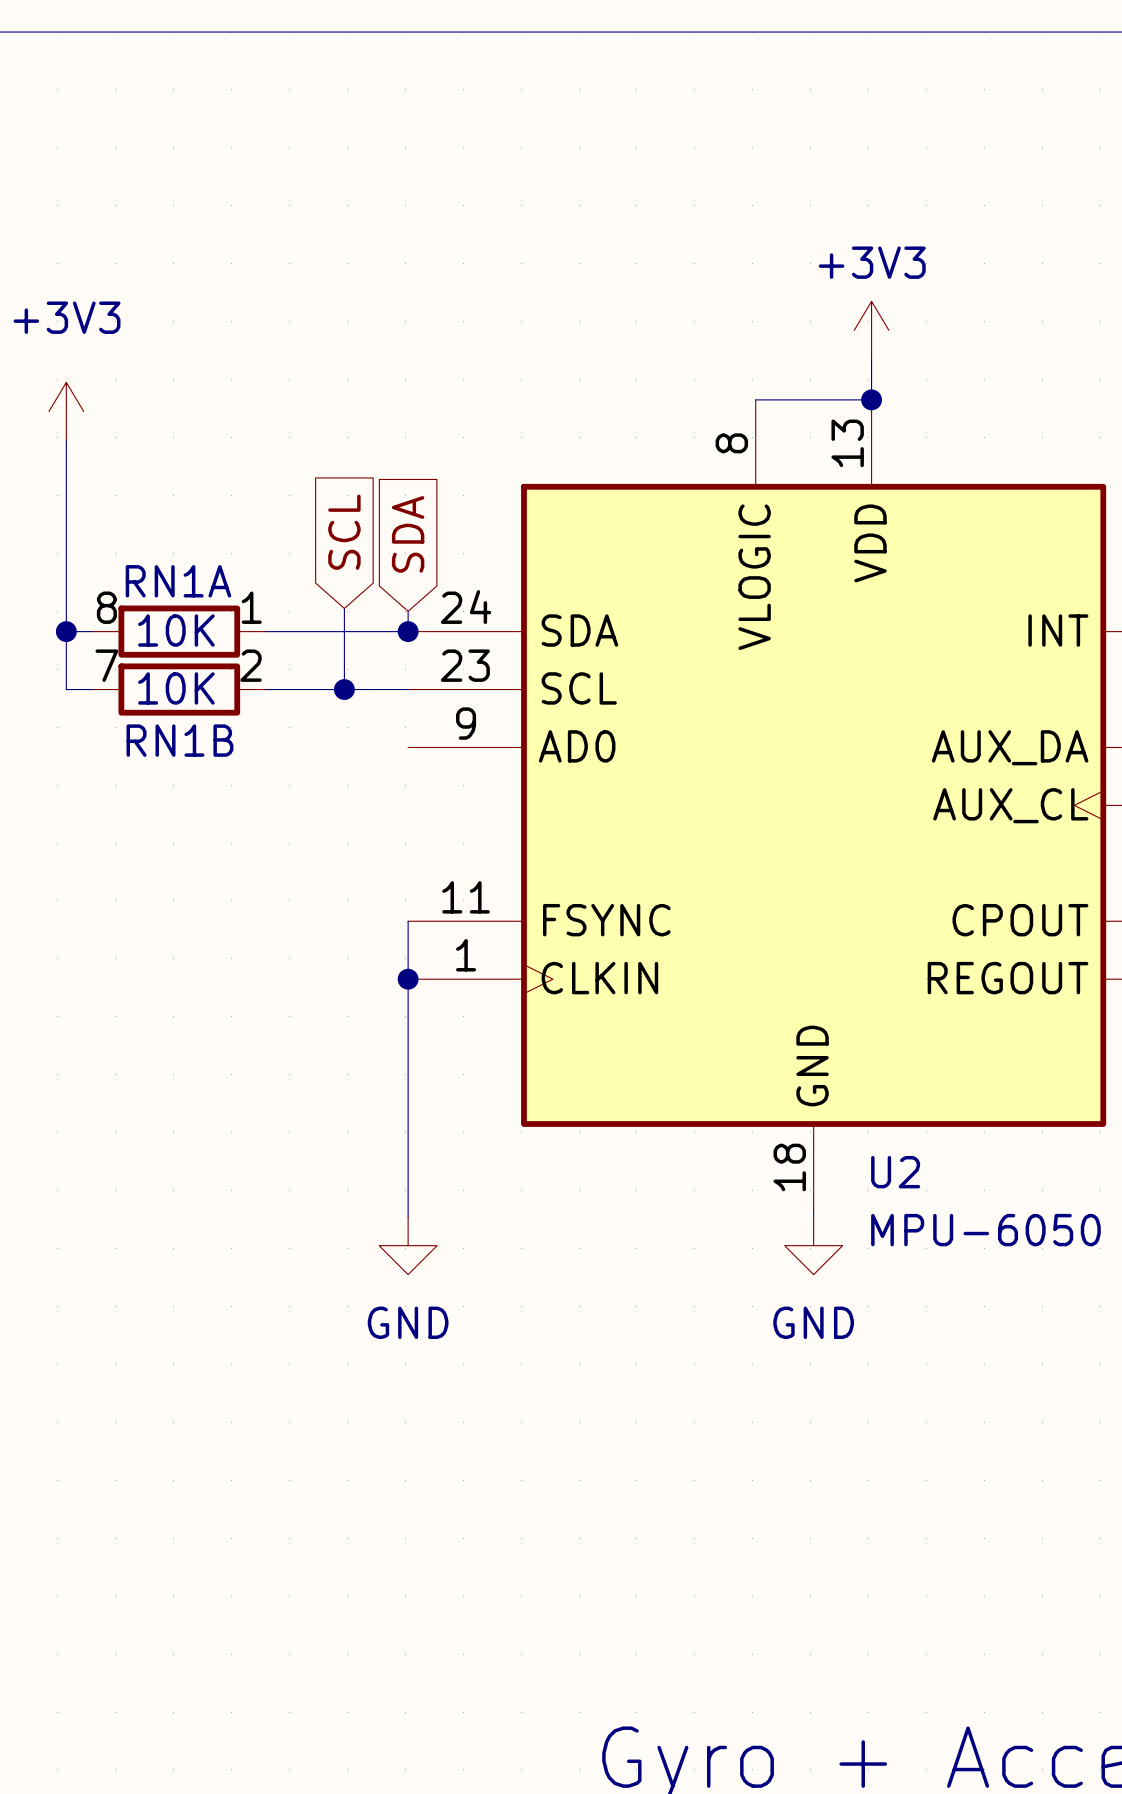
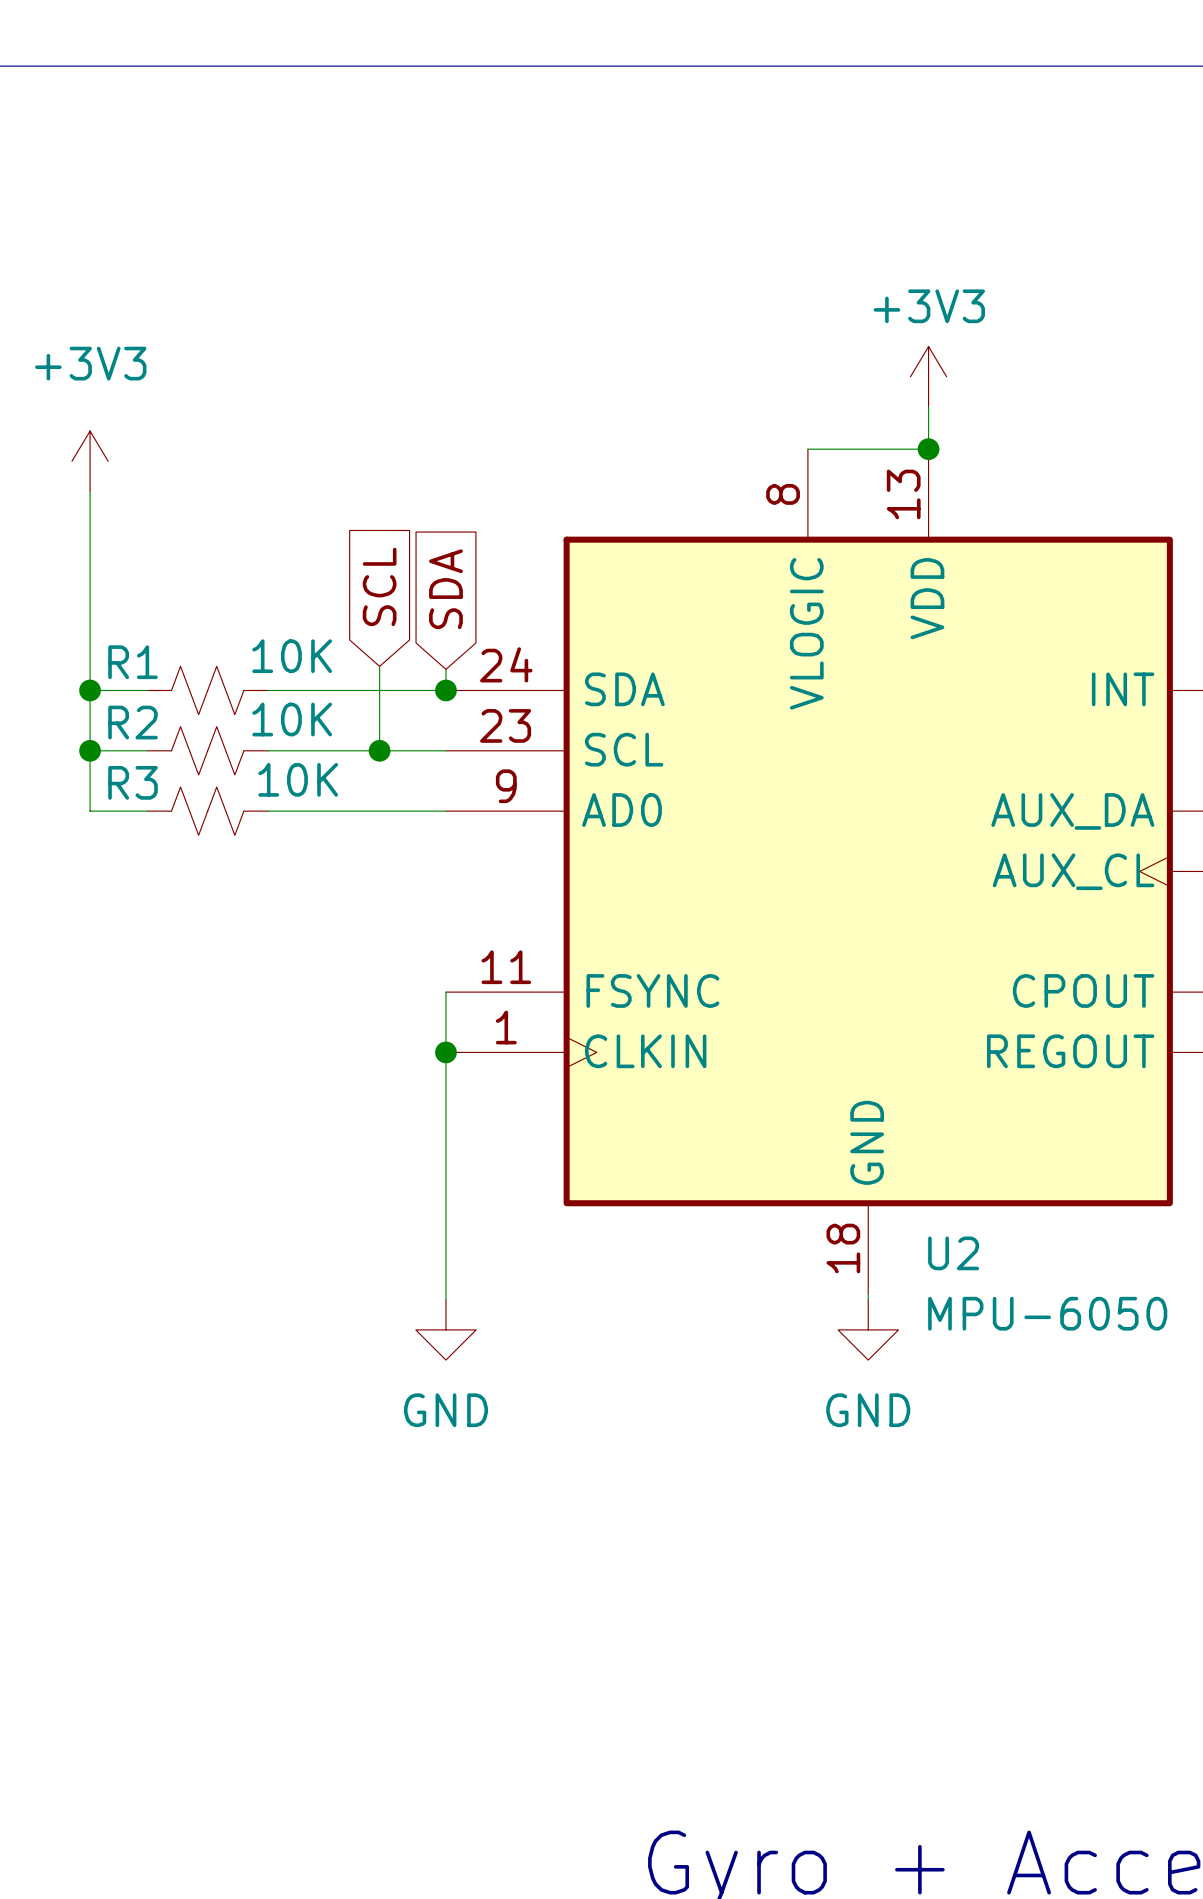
RN1A: 10K (179, 631) -> none
R2: none -> 10K (207, 690)
wire: none -> (90, 750) (90, 811) (147, 811)
junction: none -> (90, 750)
RN1B: 10K (179, 689) -> none
R1: none -> 10K (207, 750)
R3: none -> 10K (207, 811)
wire: none -> (268, 811) (445, 811)

